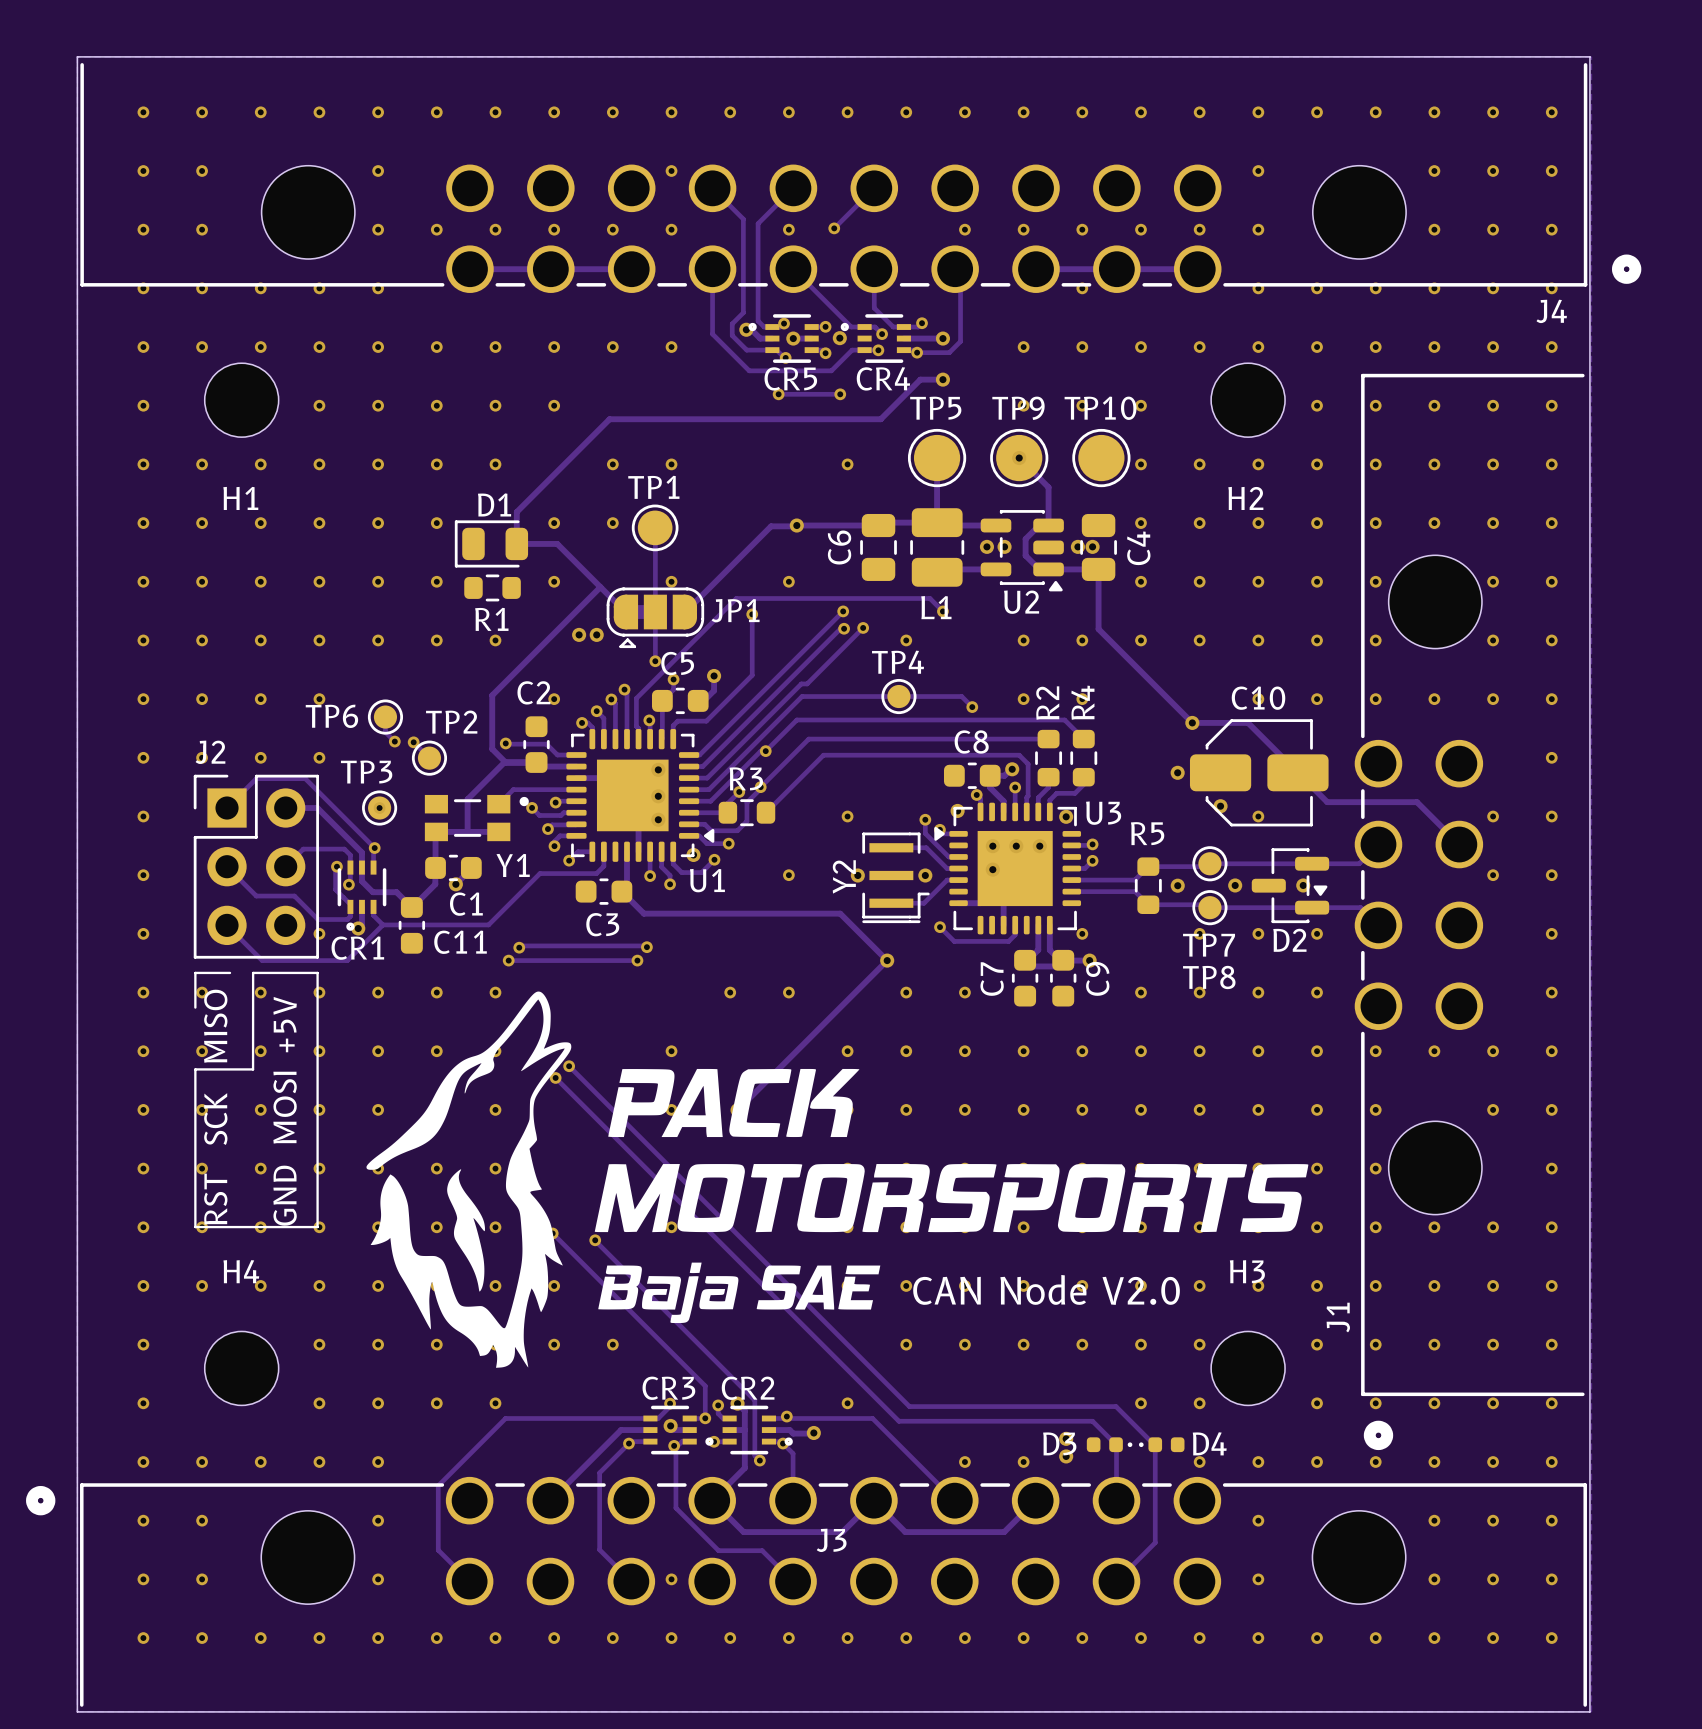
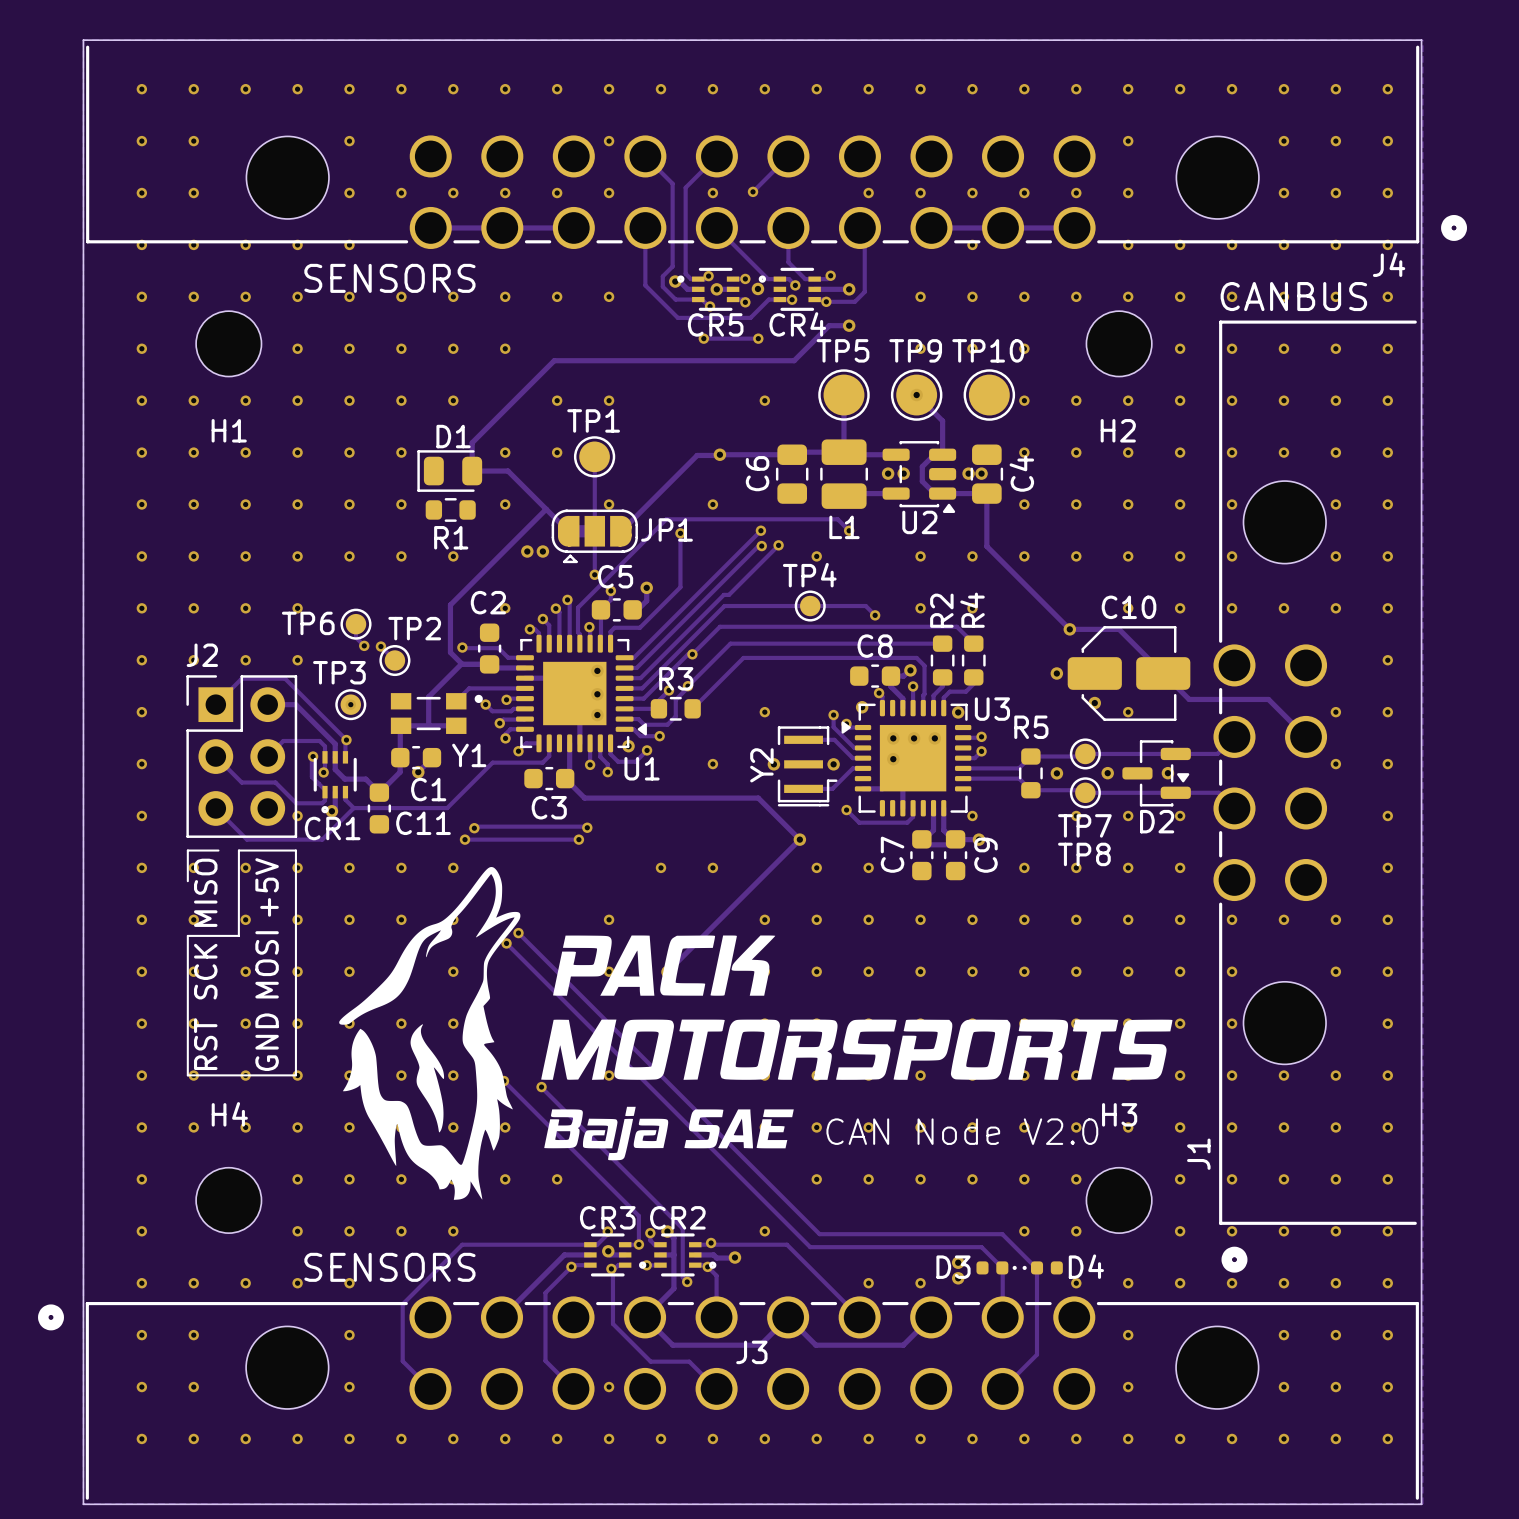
text: none -> SENSORS (389, 278)
text: none -> CANBUS (1293, 296)
text: none -> SENSORS (389, 1267)

